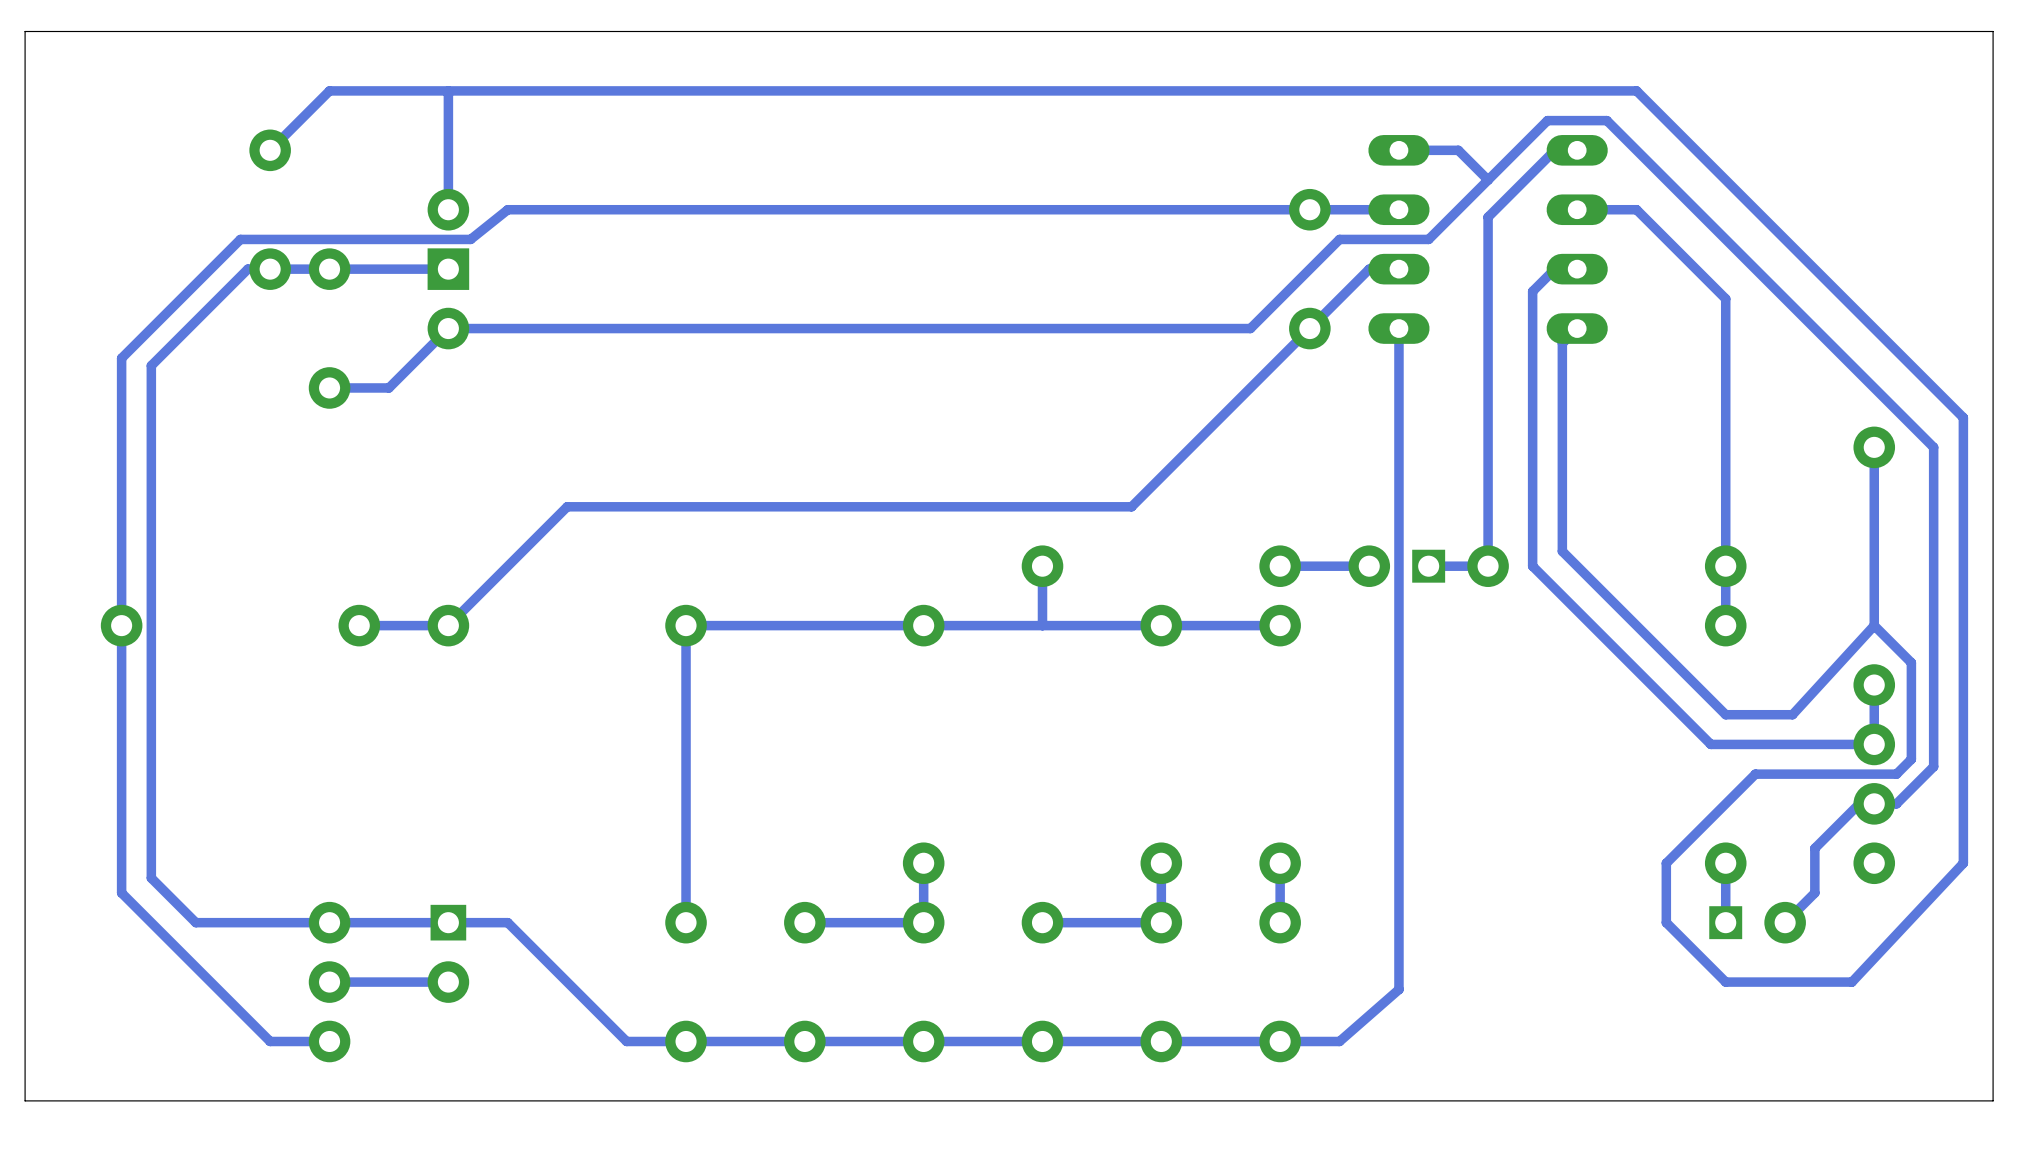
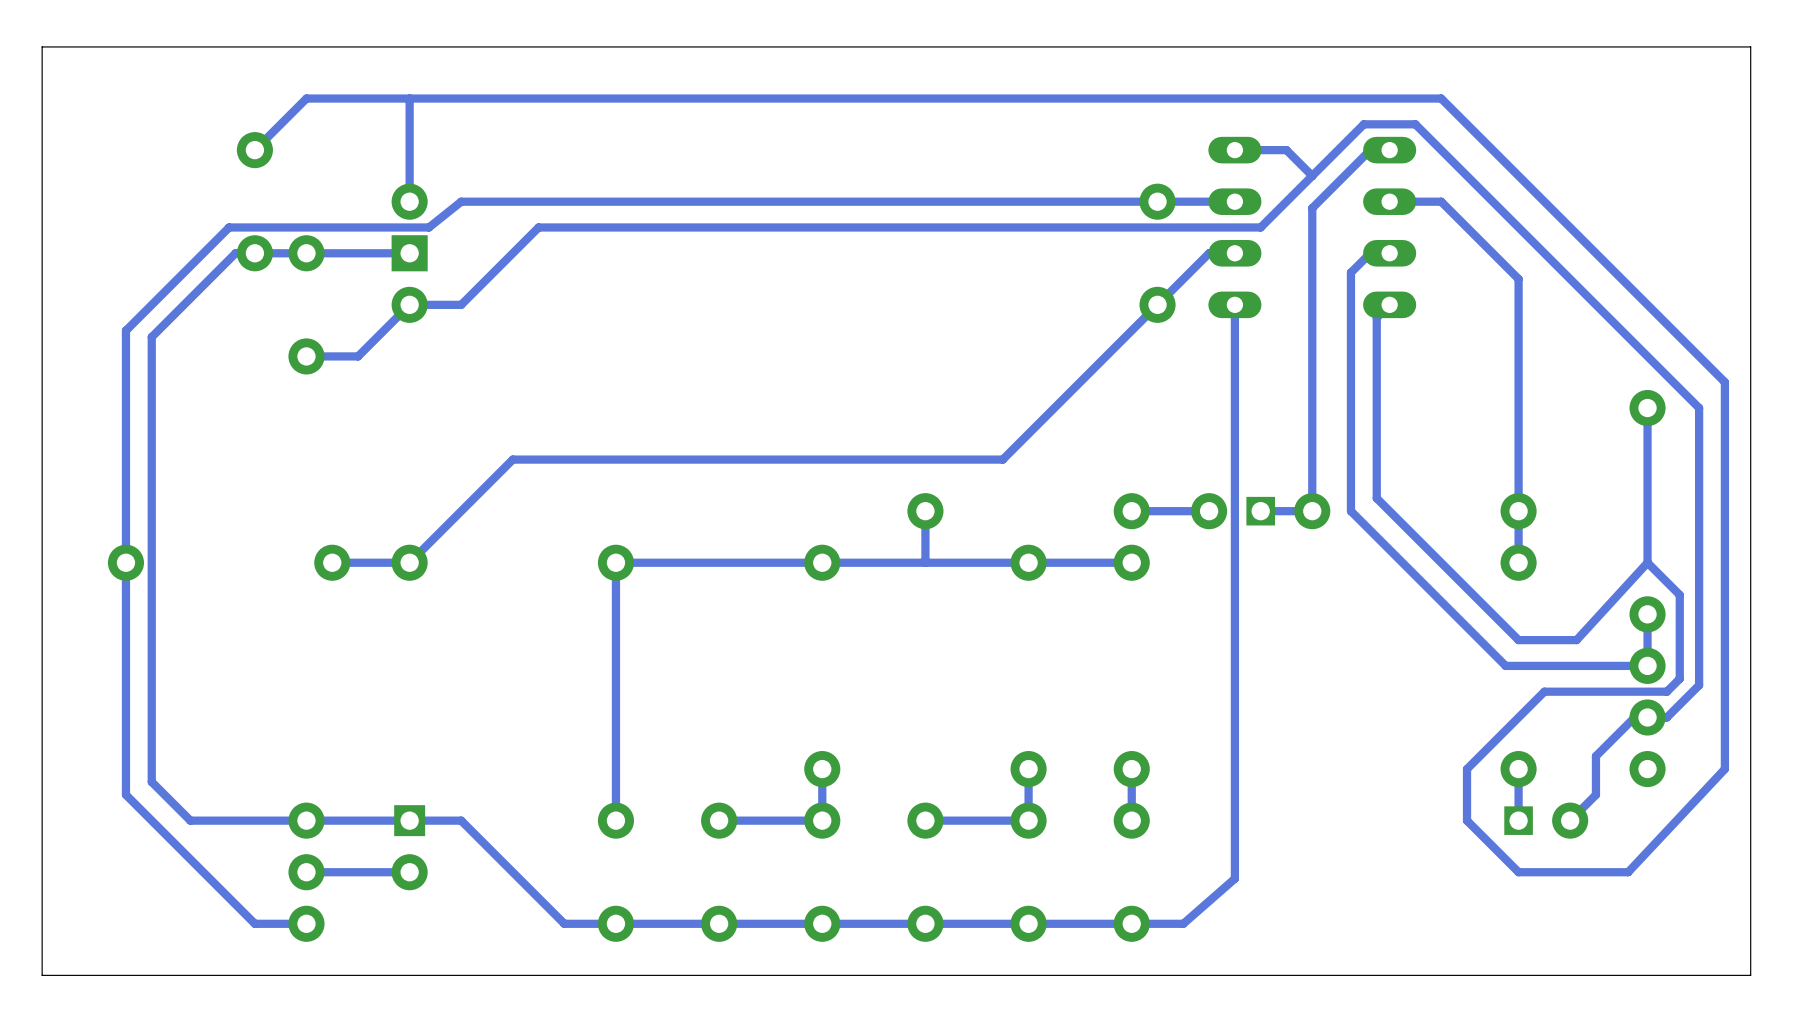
bottom track: (1339, 239) (1250, 328) (507, 328) -> (1183, 227) (538, 227) (461, 304)

